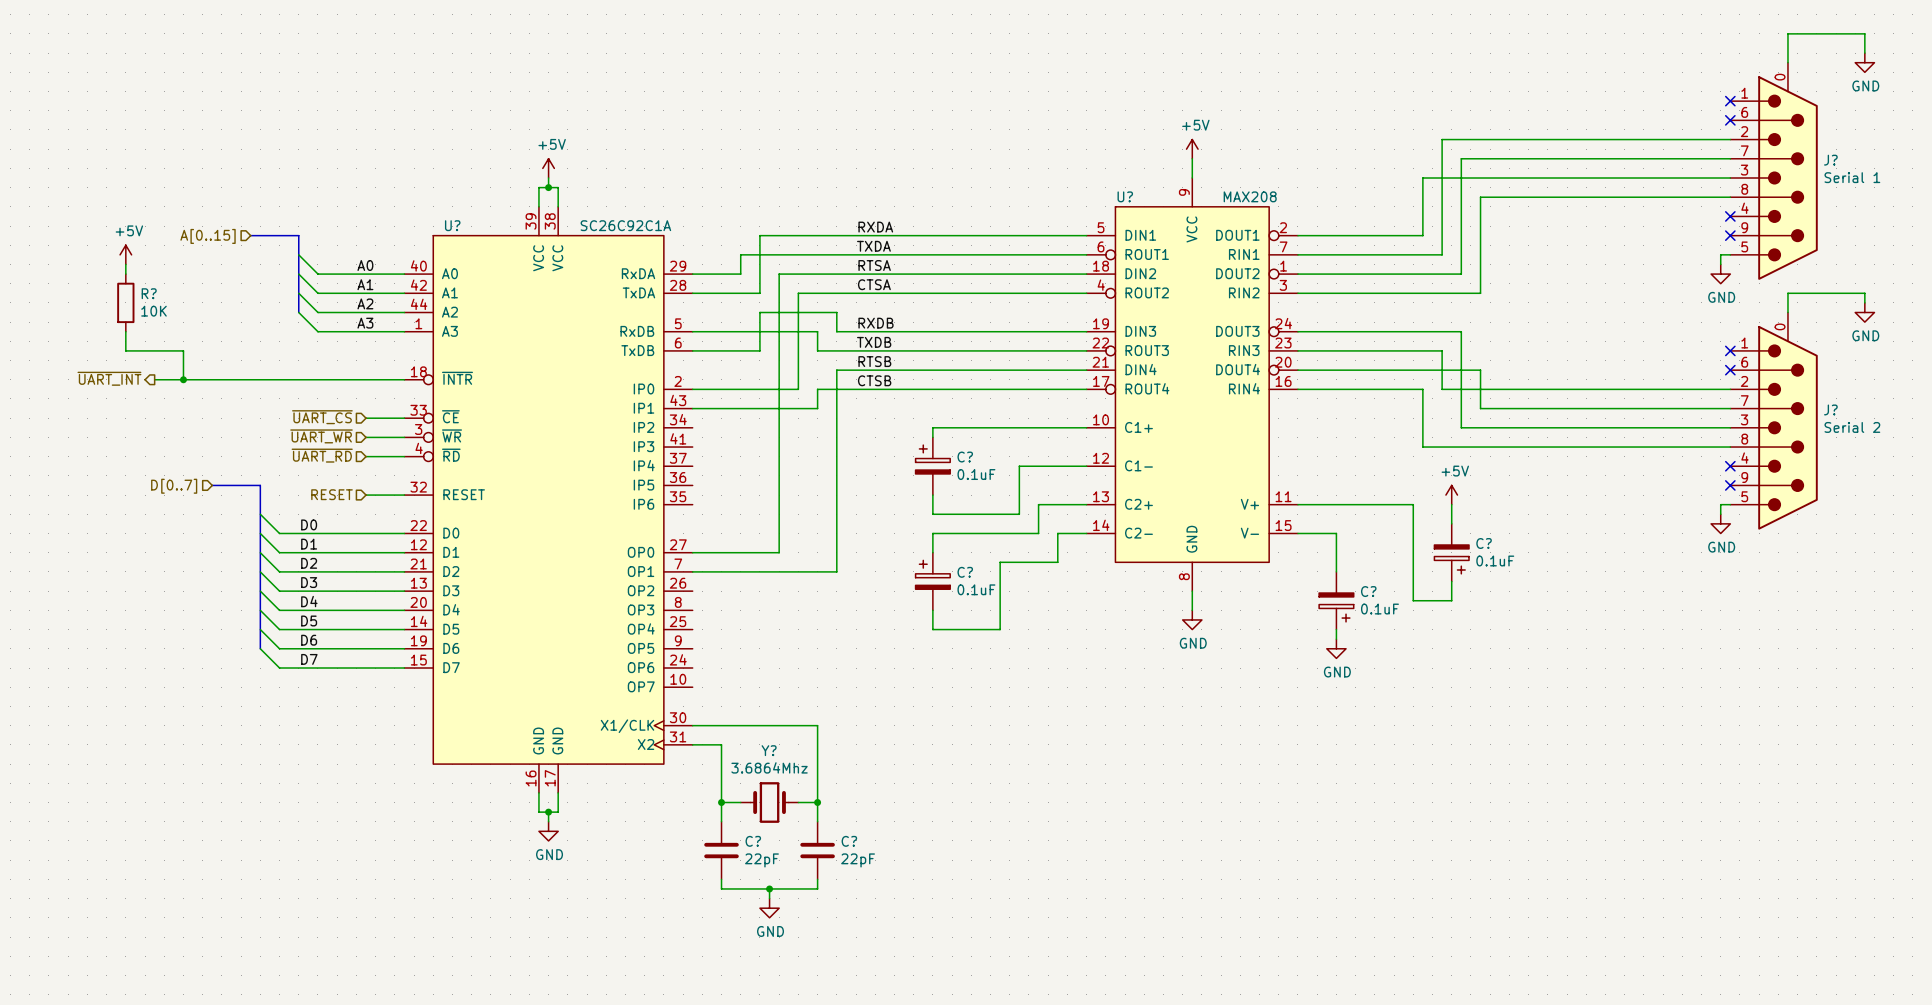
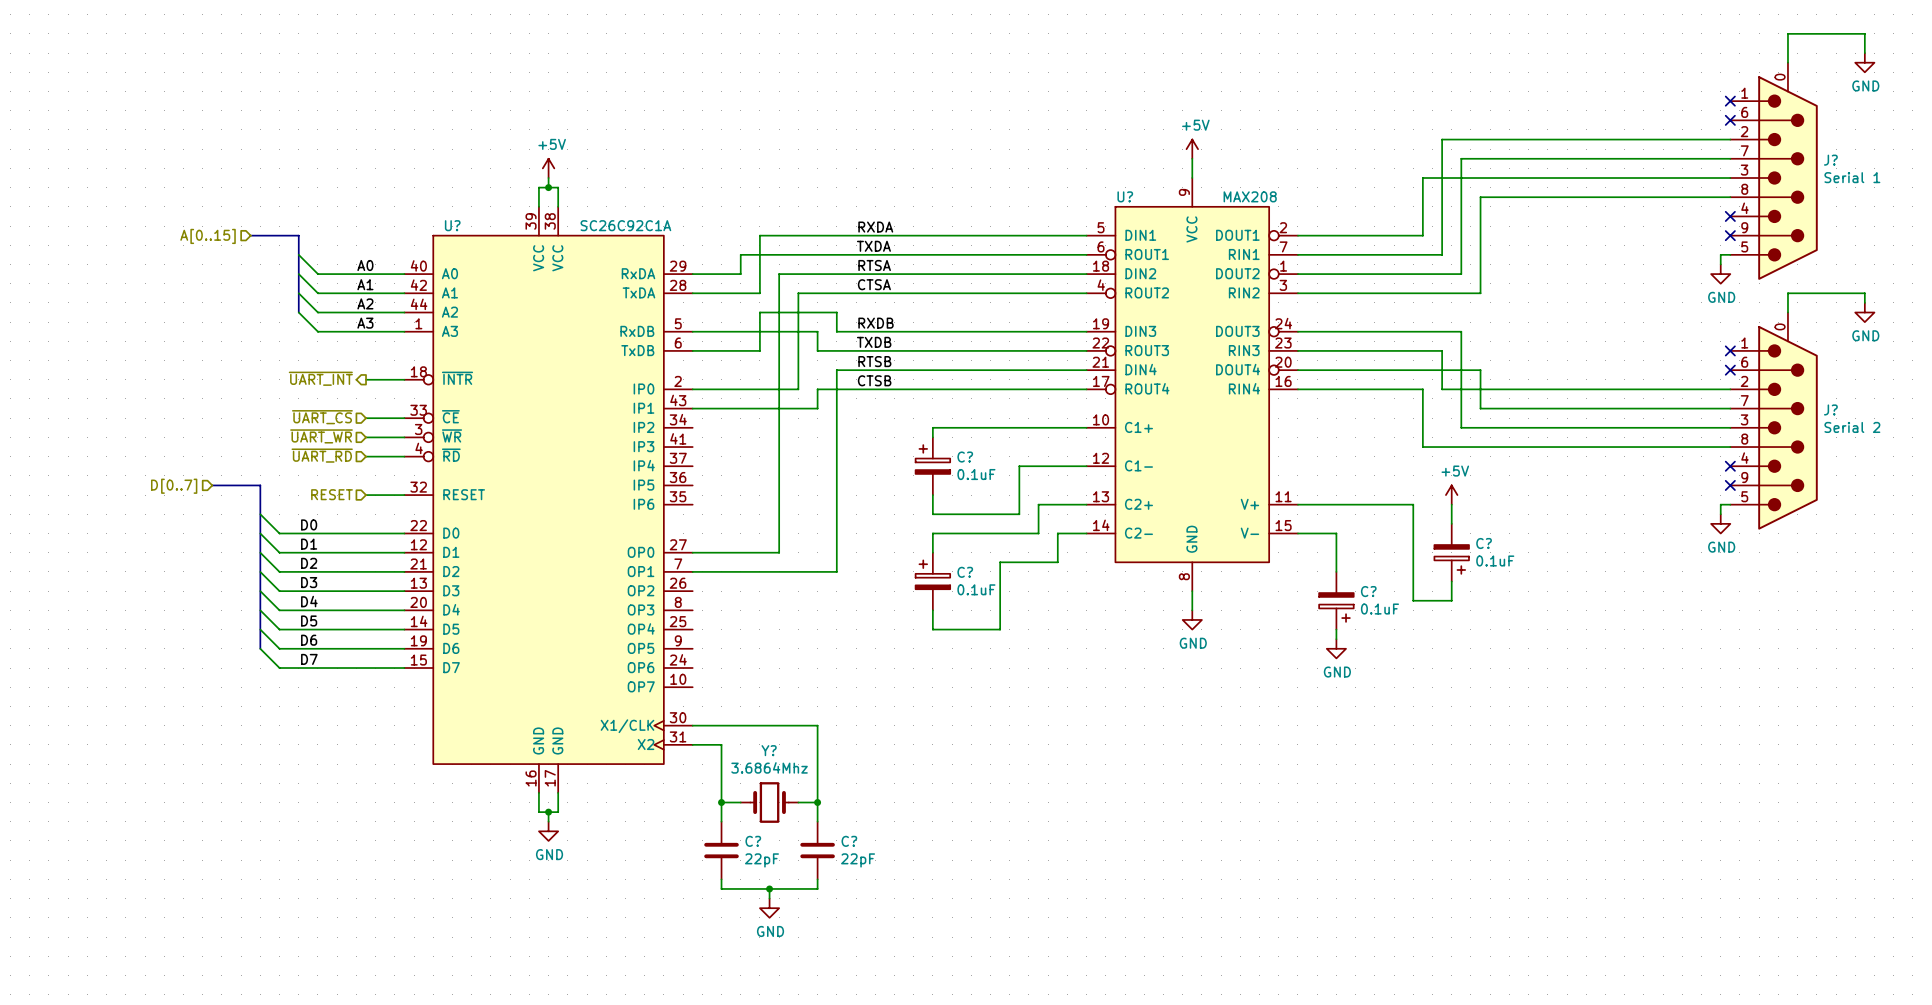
power symbol: +5V (125, 254) -> none
wire: (125, 264) (125, 274) -> none
R?: 10K (125, 302) -> none
wire: (125, 331) (125, 350) (183, 350) (183, 379) -> none
hierarchical label: ~{UART_INT} (109, 378) -> none
hierarchical label: none -> ~{UART_INT} (320, 378)
wire: (154, 379) (366, 379) -> none
junction: (183, 379) -> none

